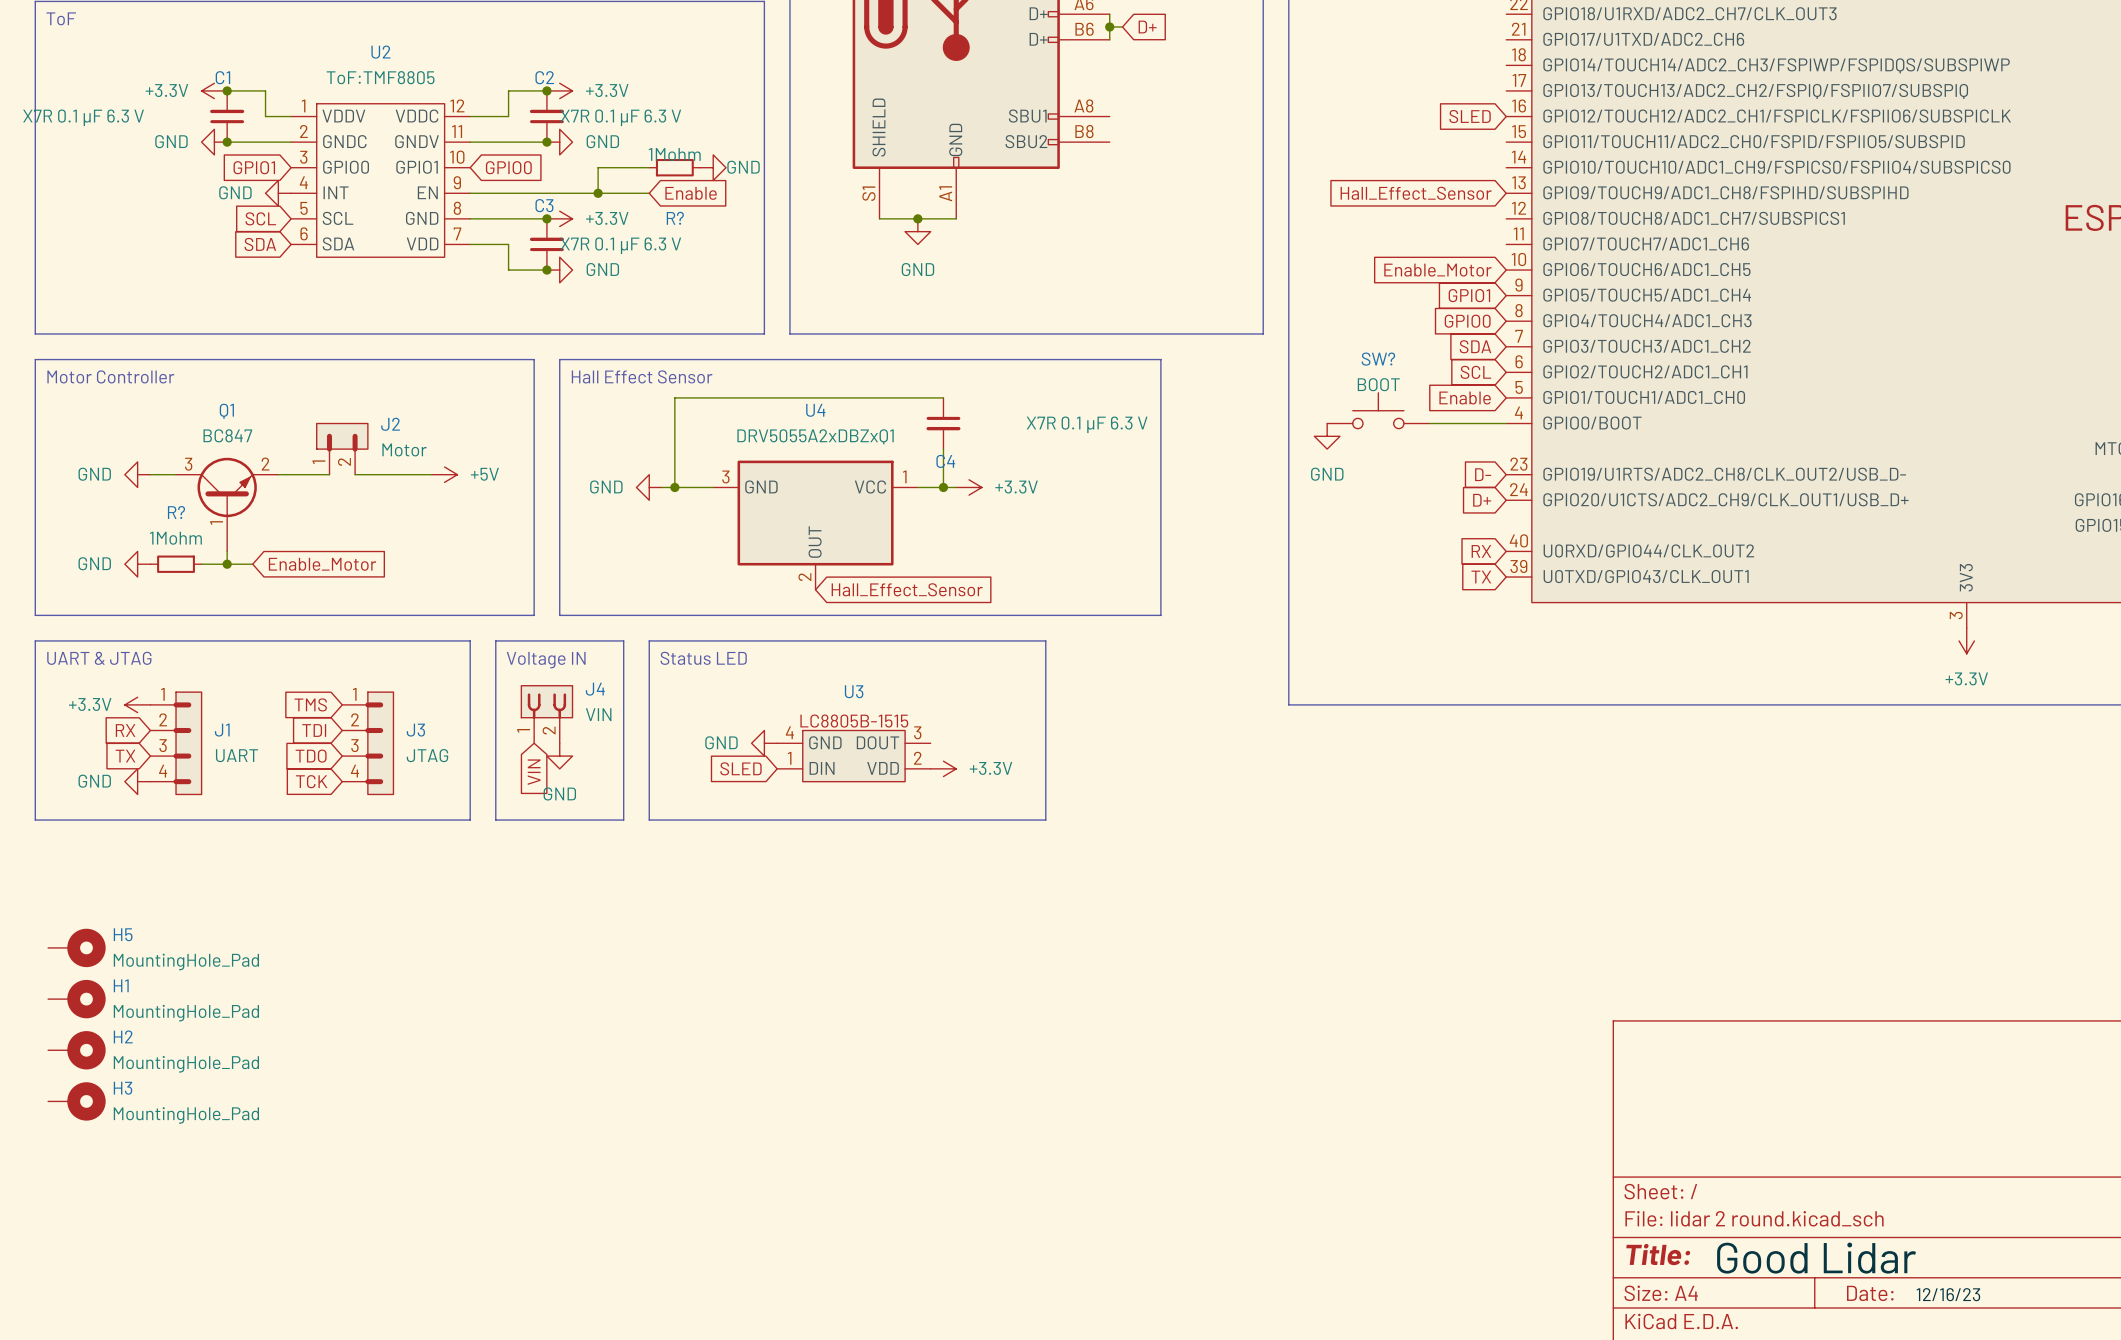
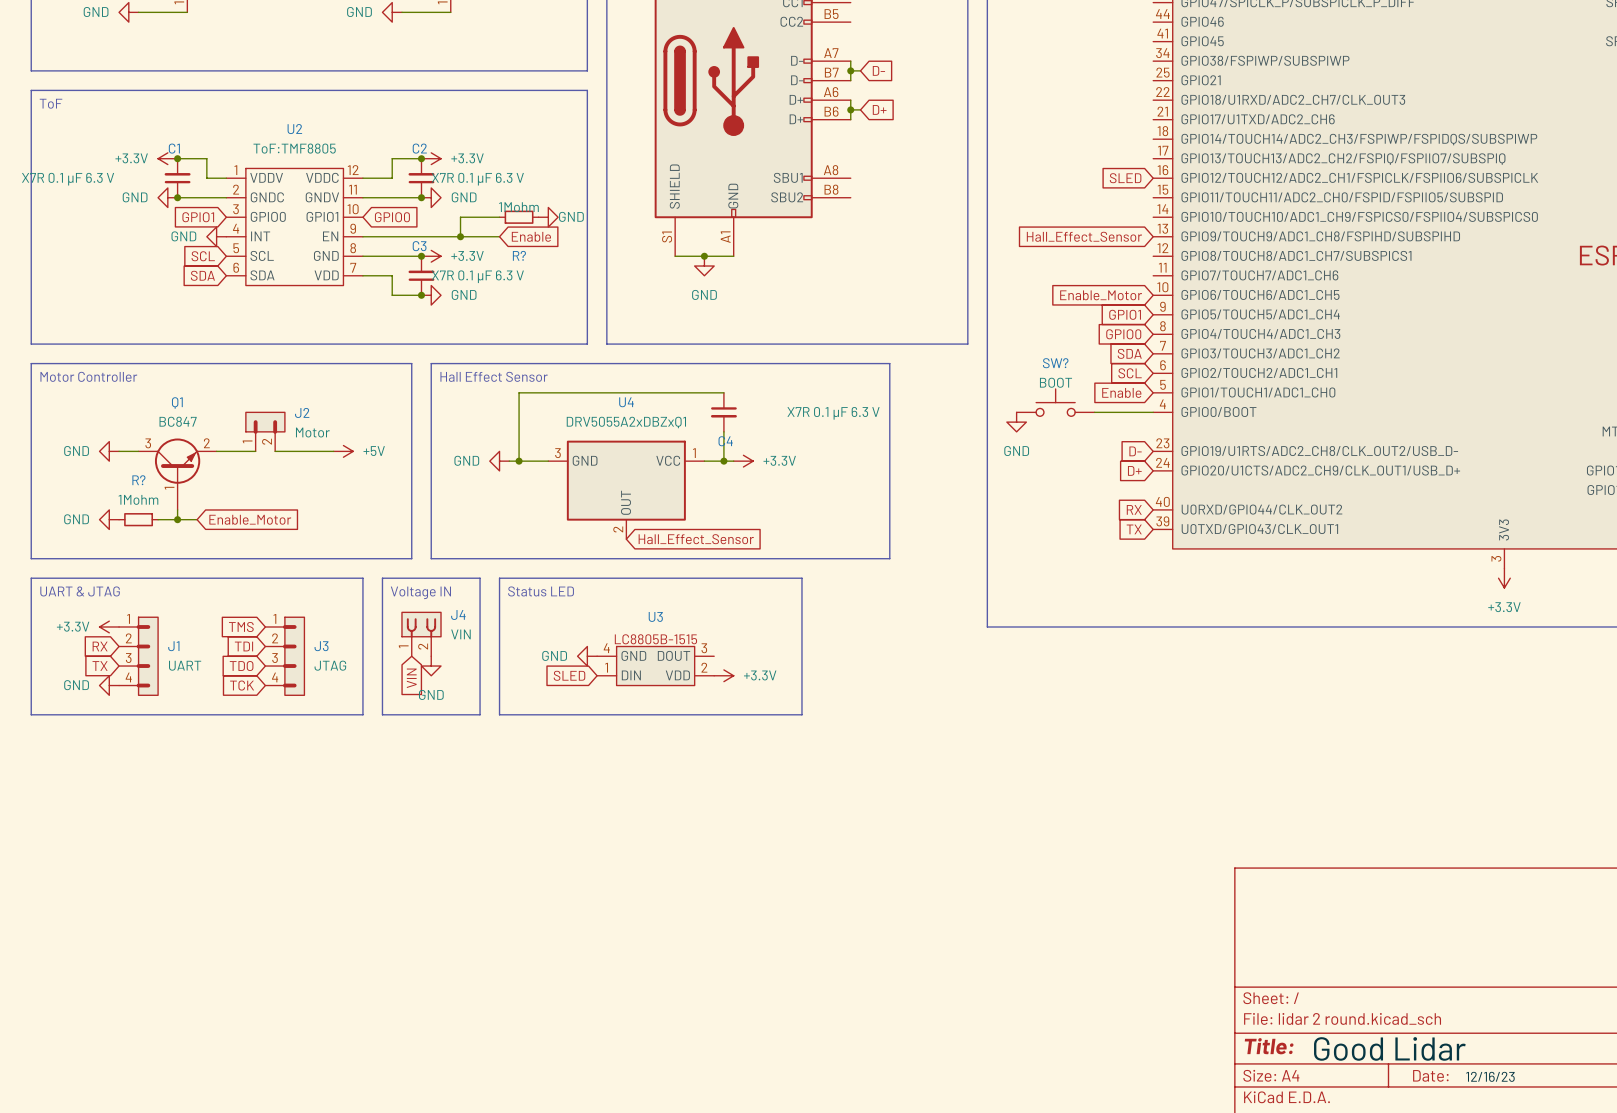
H5: MountingHole_Pad (76, 947) -> none
H1: MountingHole_Pad (76, 999) -> none
H2: MountingHole_Pad (76, 1050) -> none
H3: MountingHole_Pad (76, 1101) -> none

